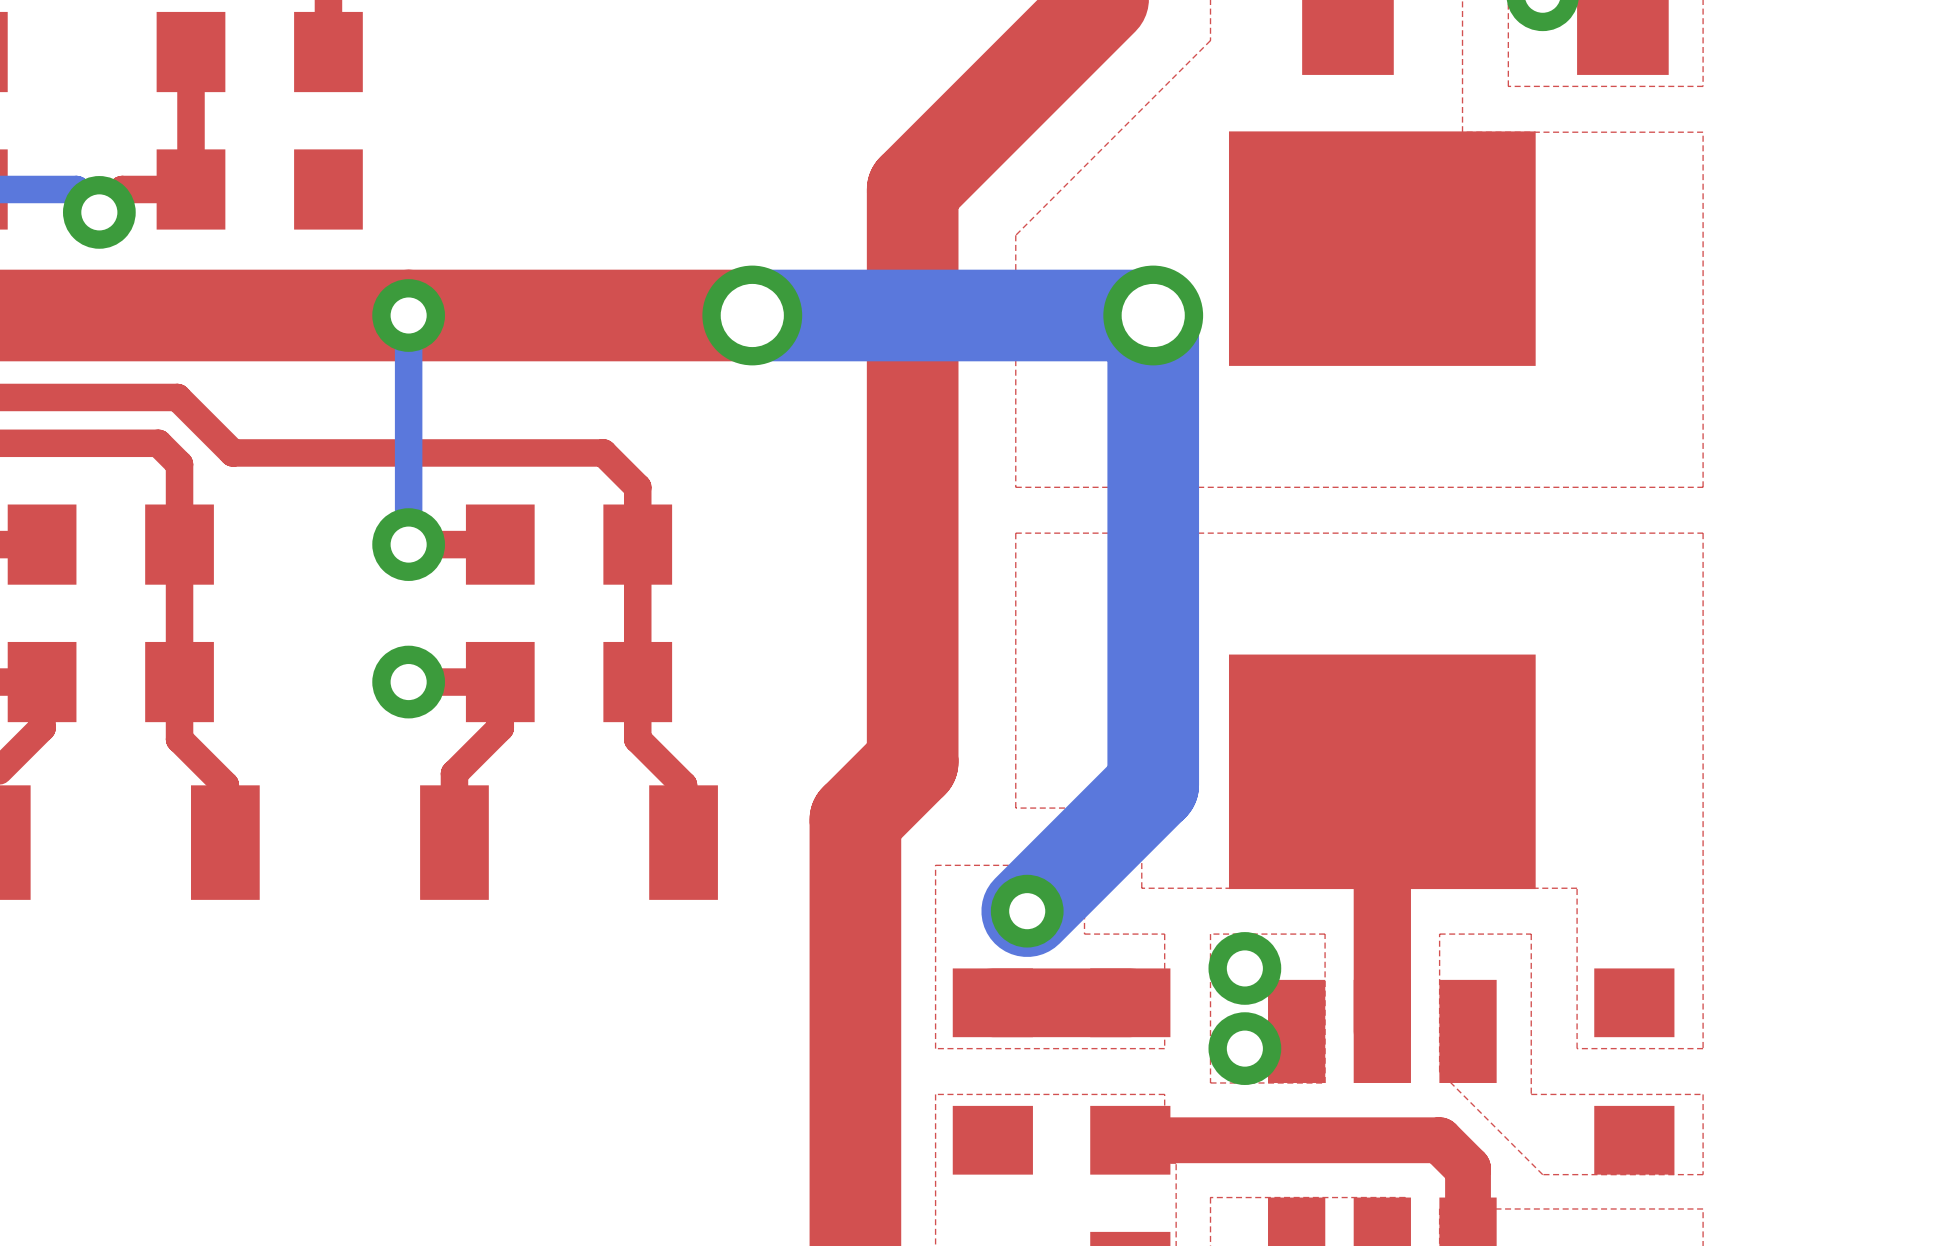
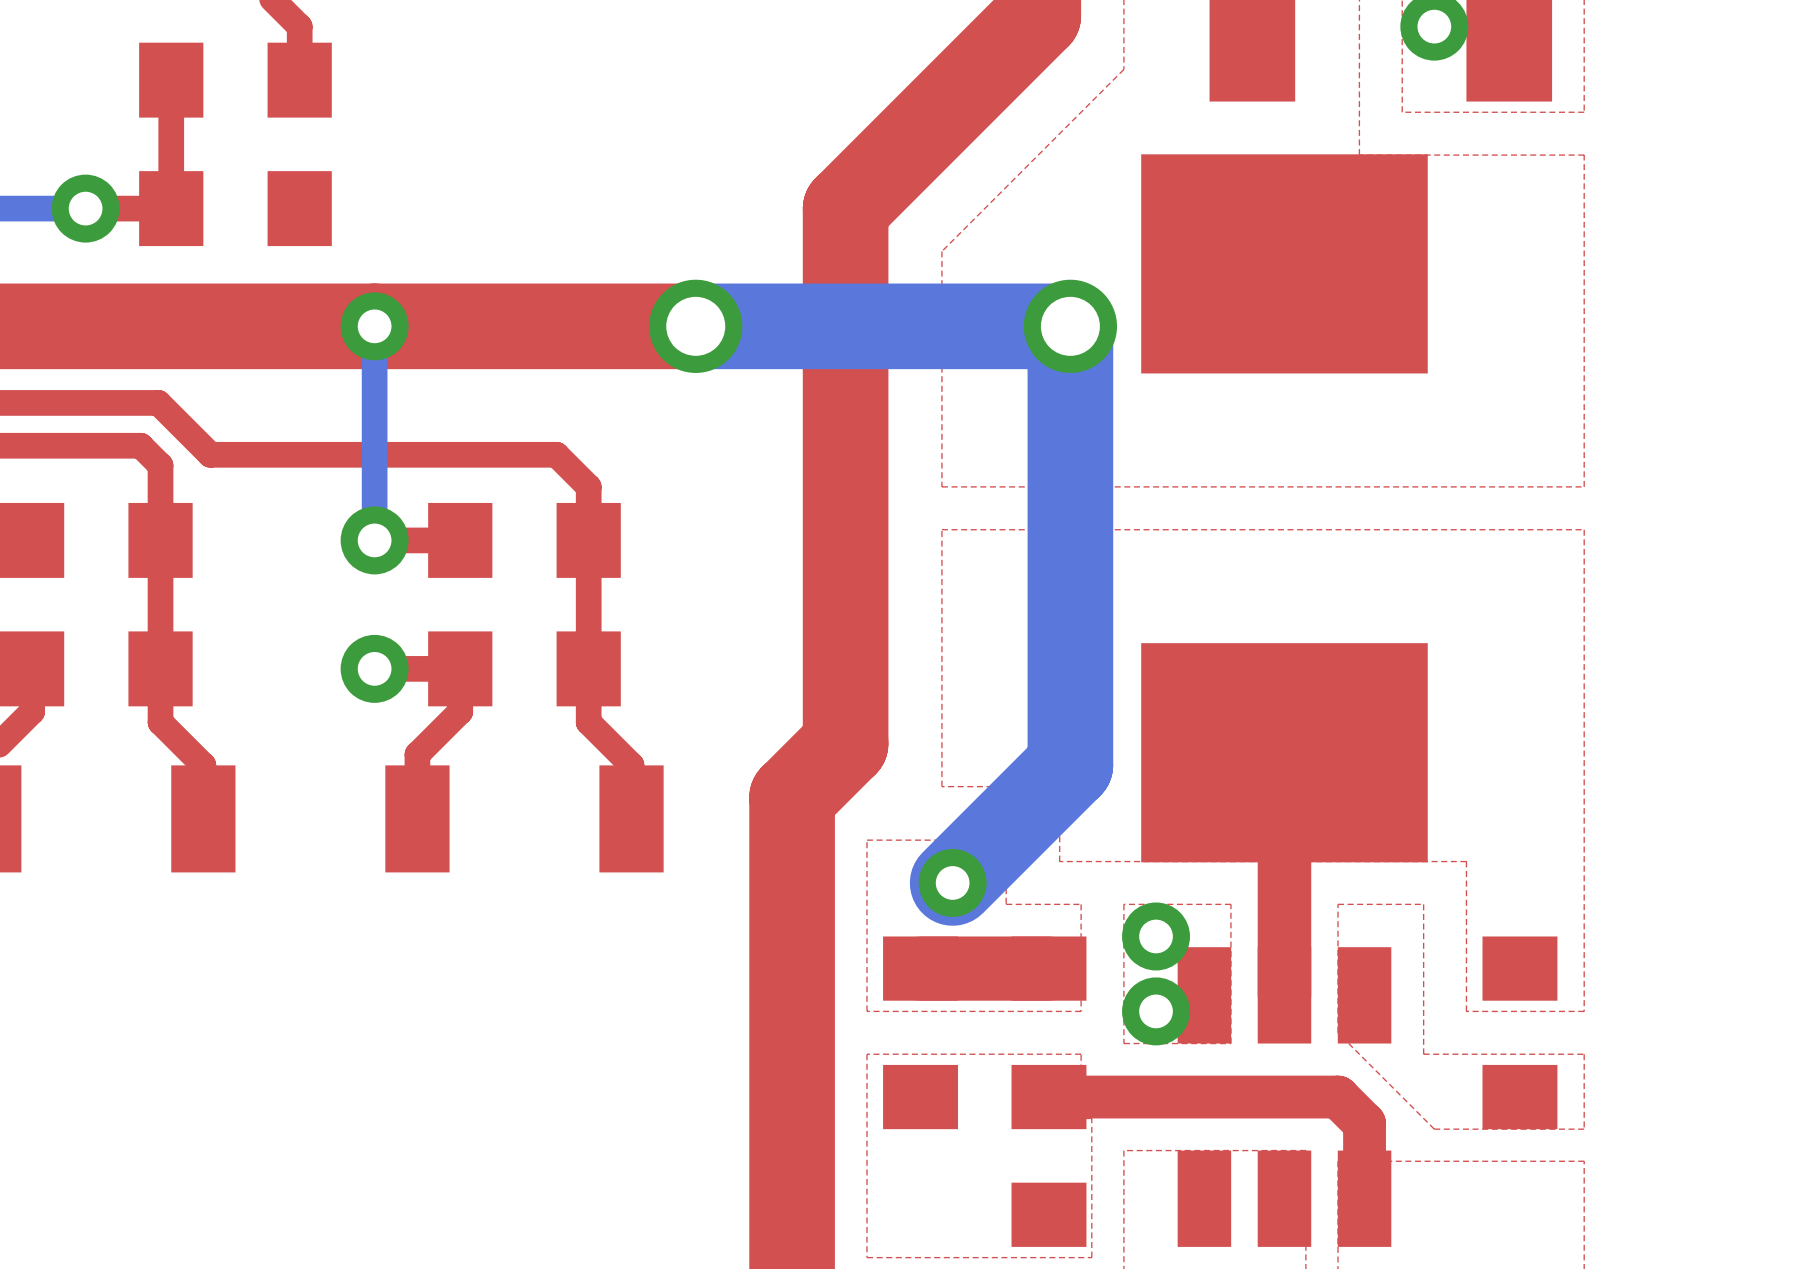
via position: (99, 212) -> (85, 208)

